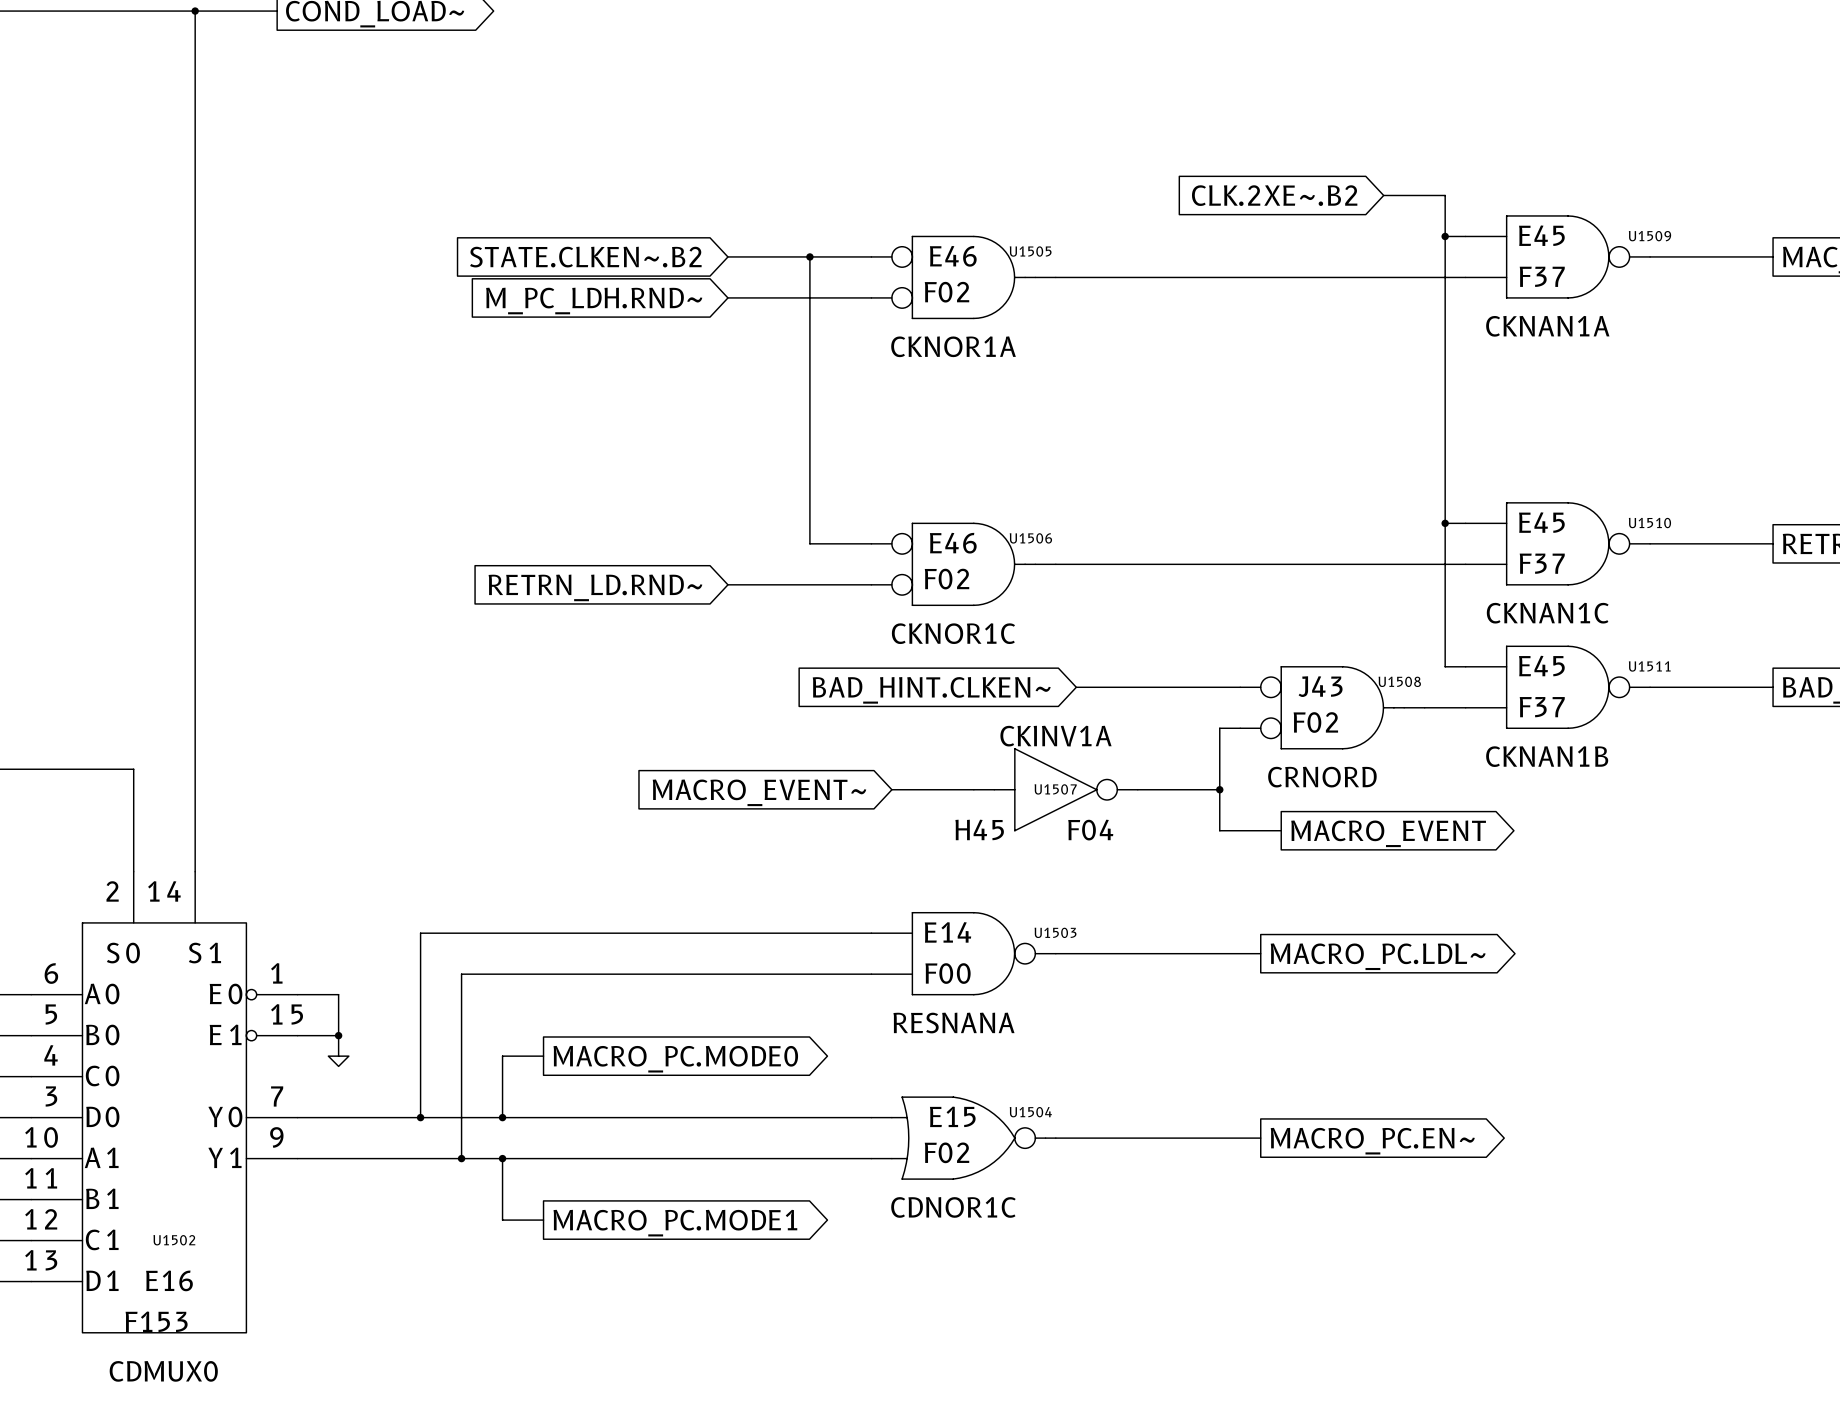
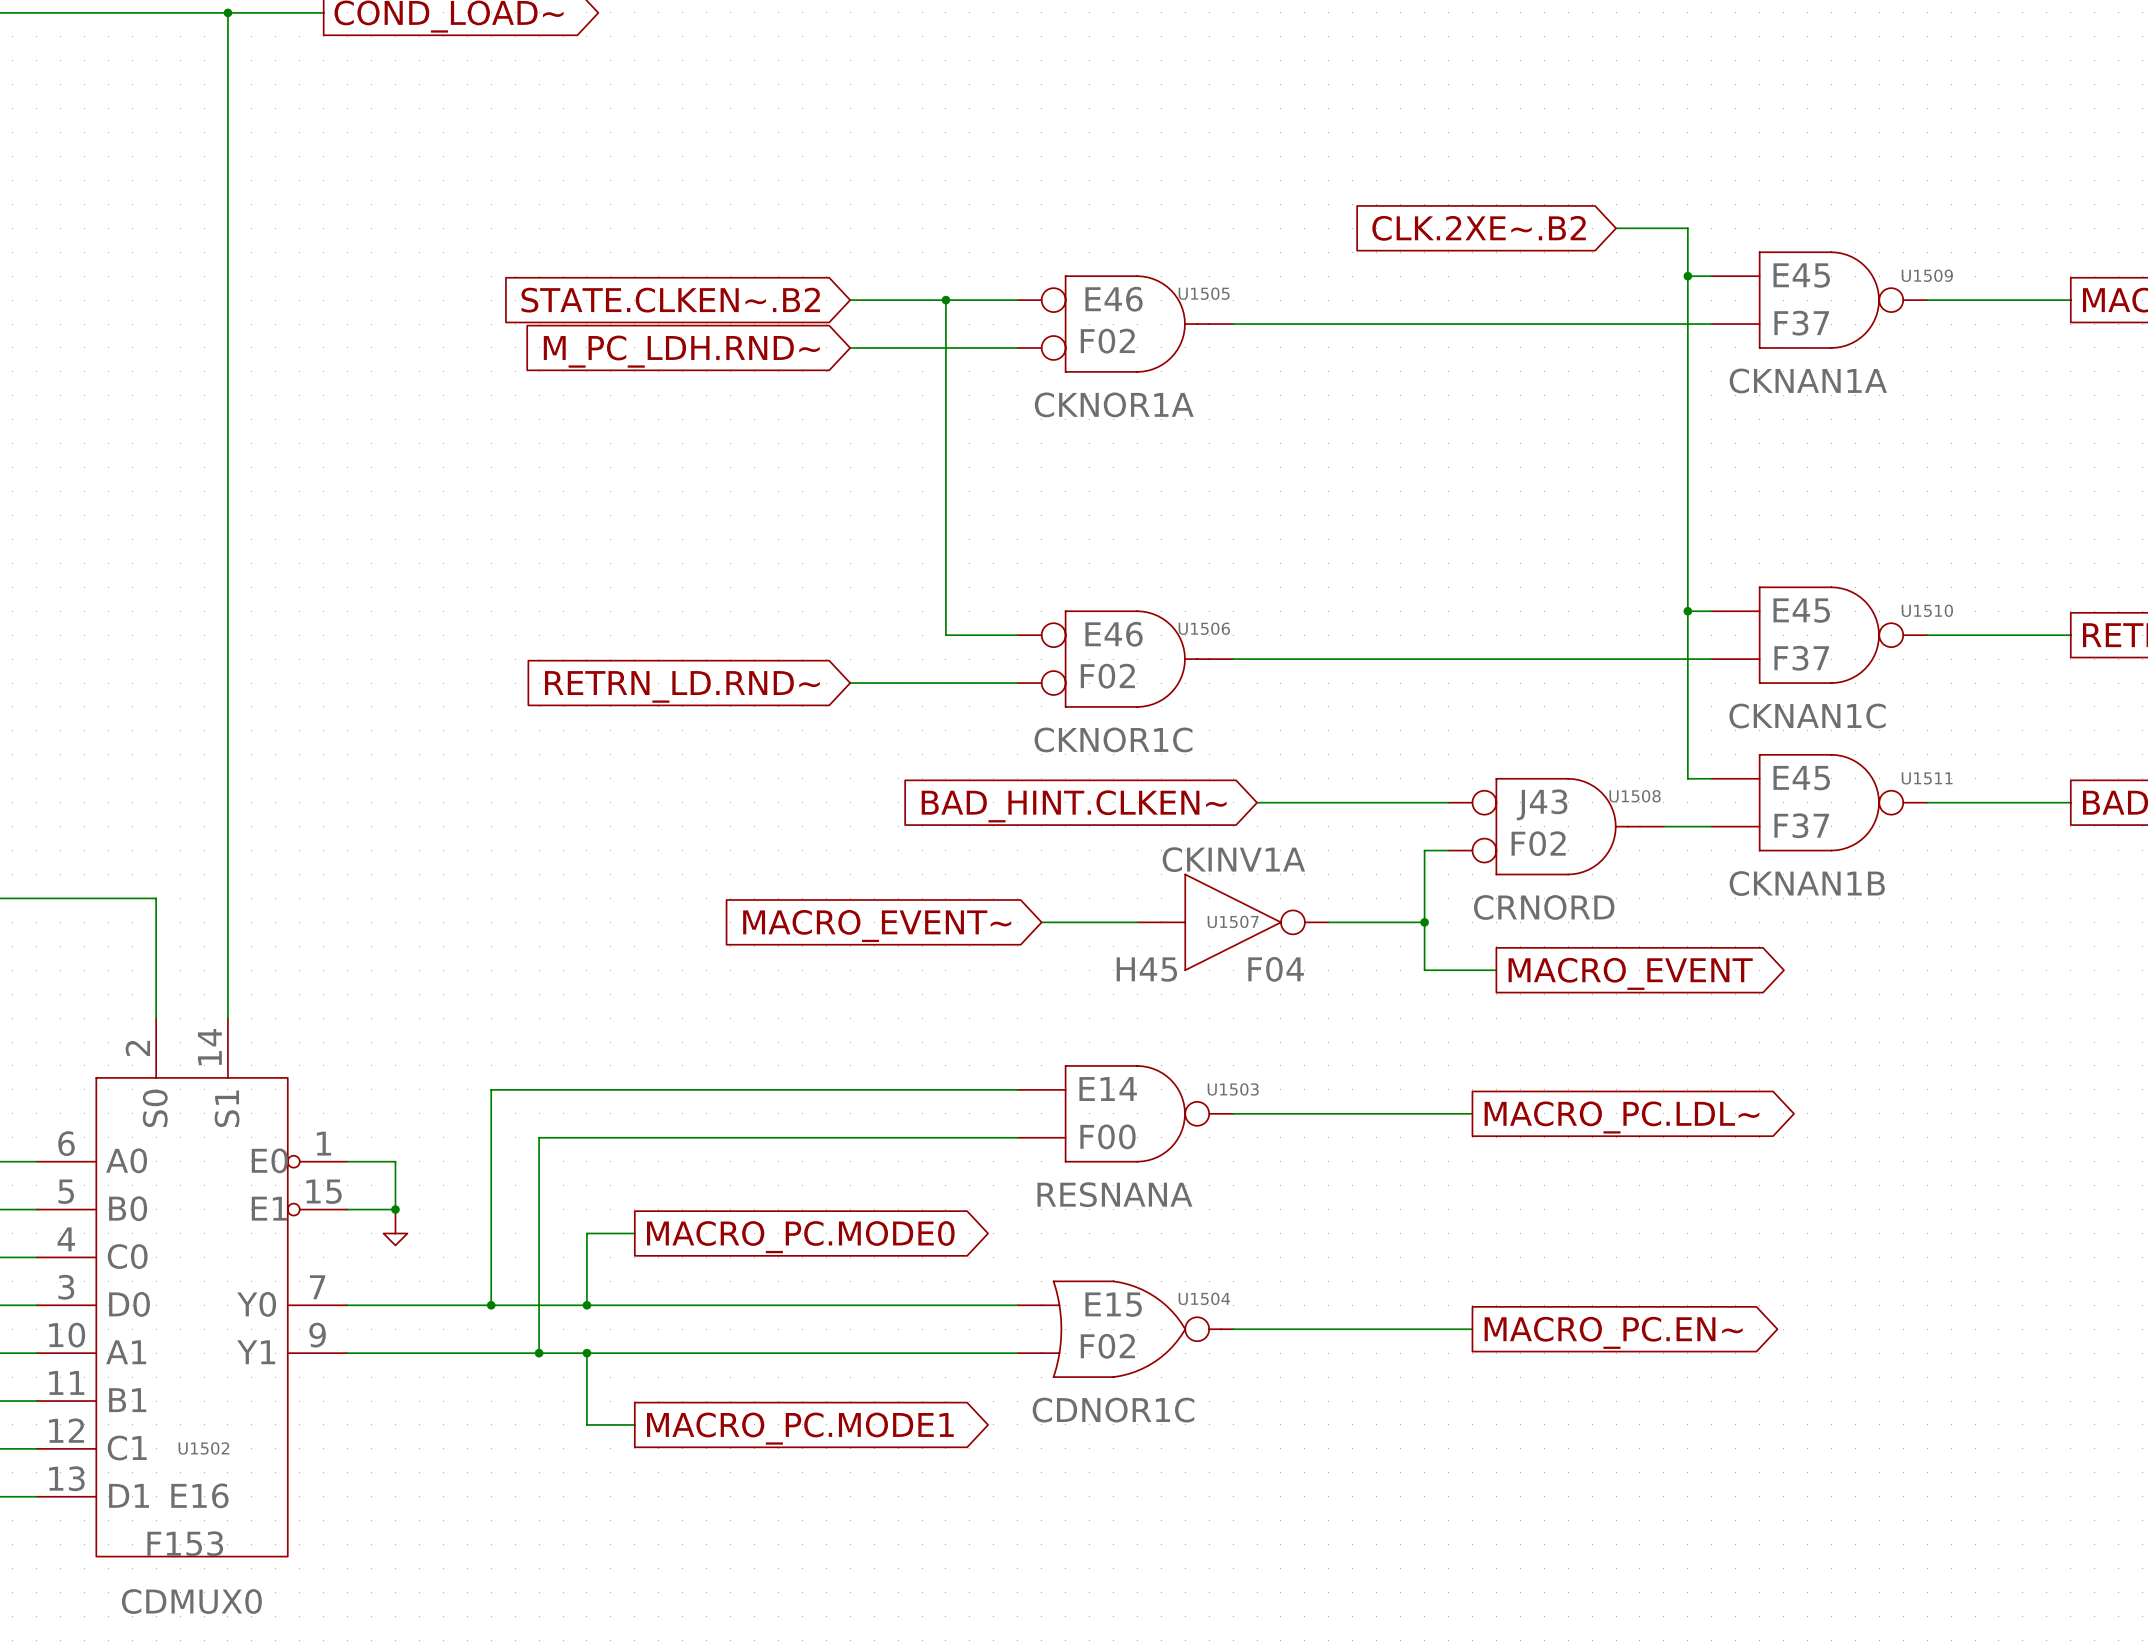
U1502 symbol: [31, 871, 298, 1333] -> [36, 1018, 348, 1557]

